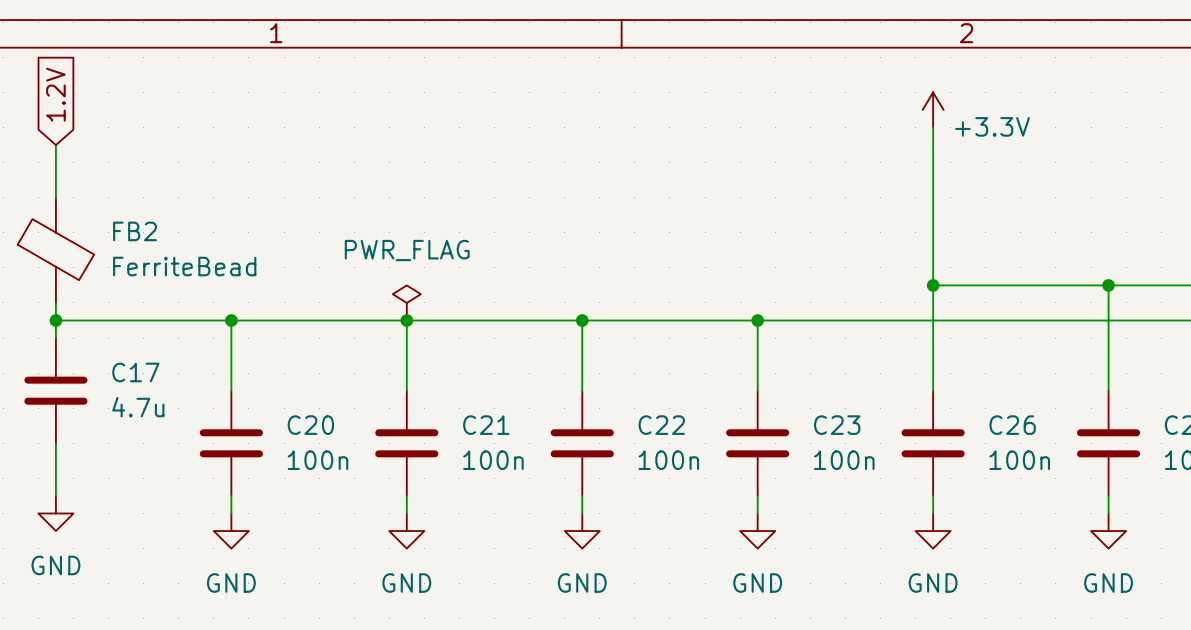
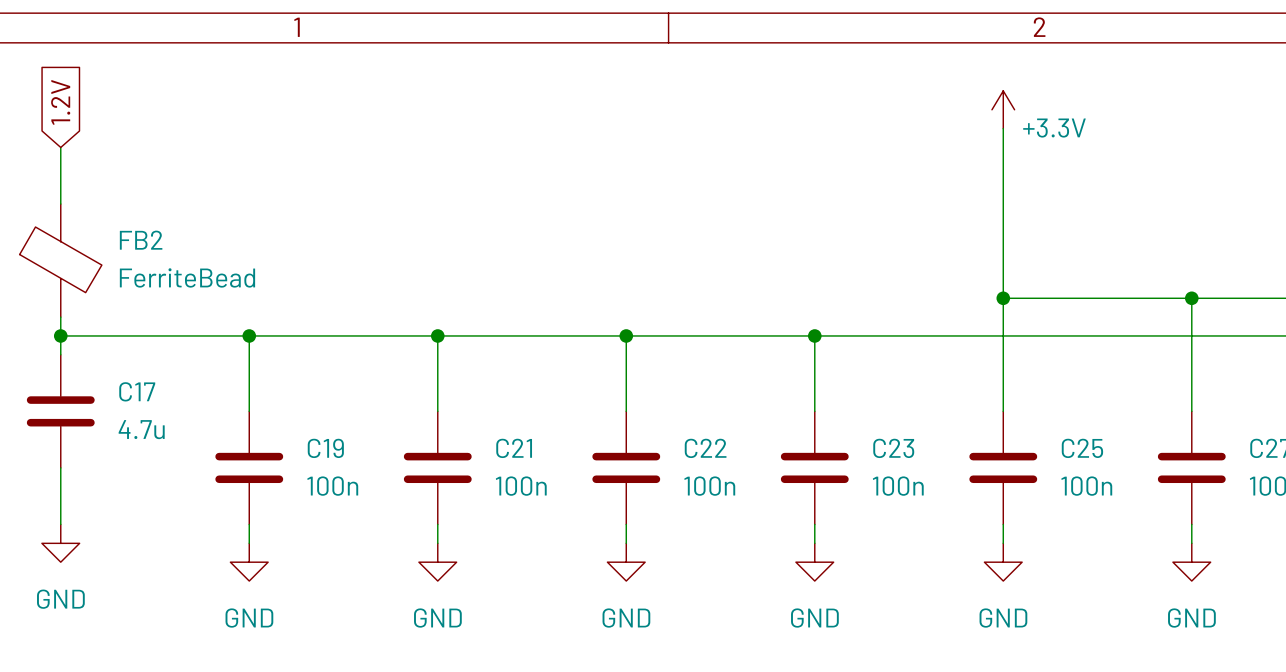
power symbol: PWR_FLAG (406, 302) -> none
C20 name: C20 (310, 425) -> C19 (325, 448)
C26 name: C26 (1012, 425) -> C25 (1082, 448)

